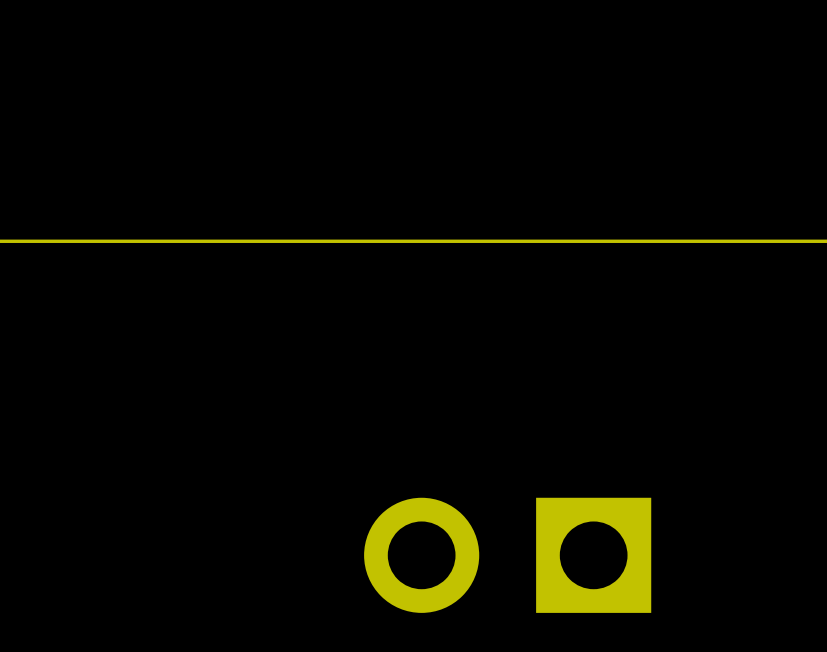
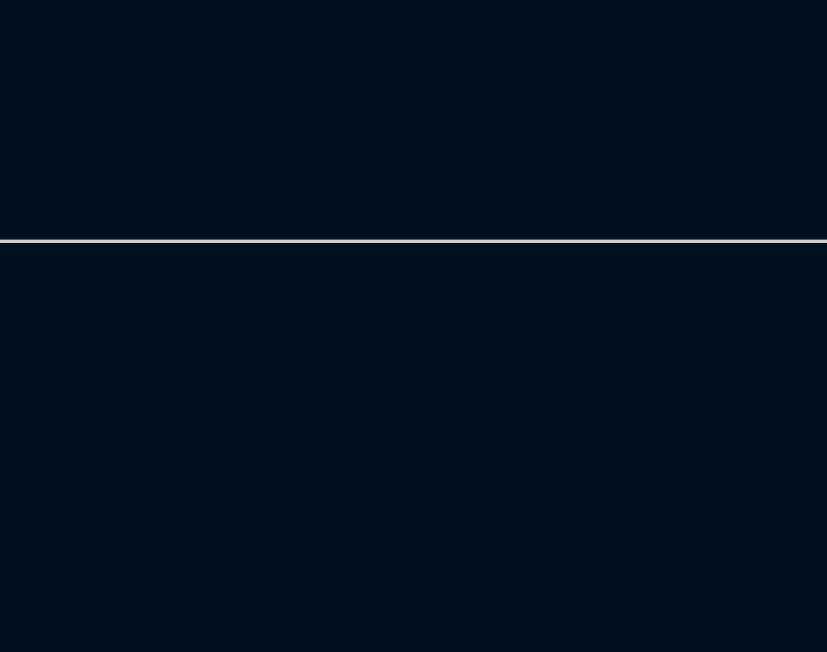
part: (507, 555) -> none

